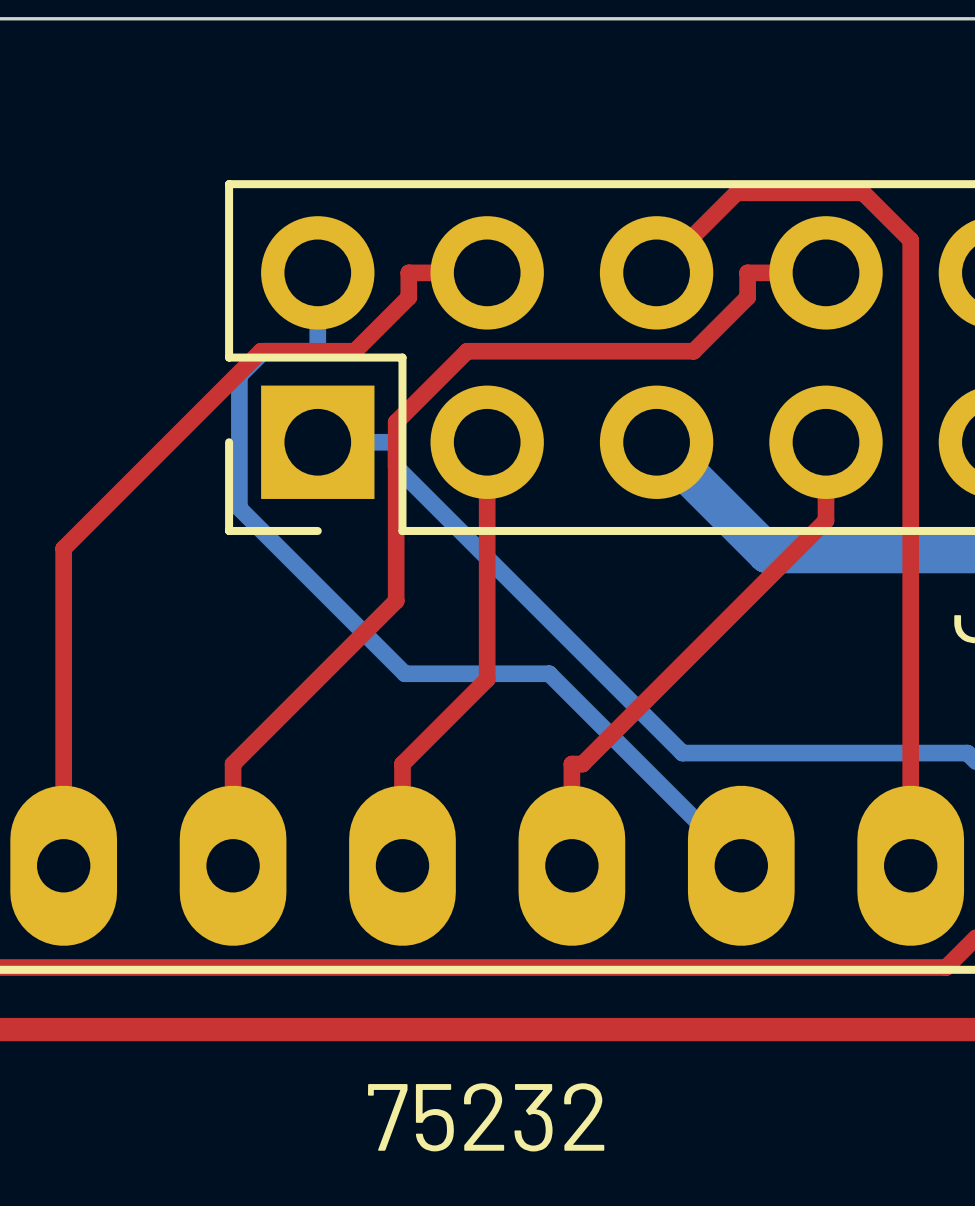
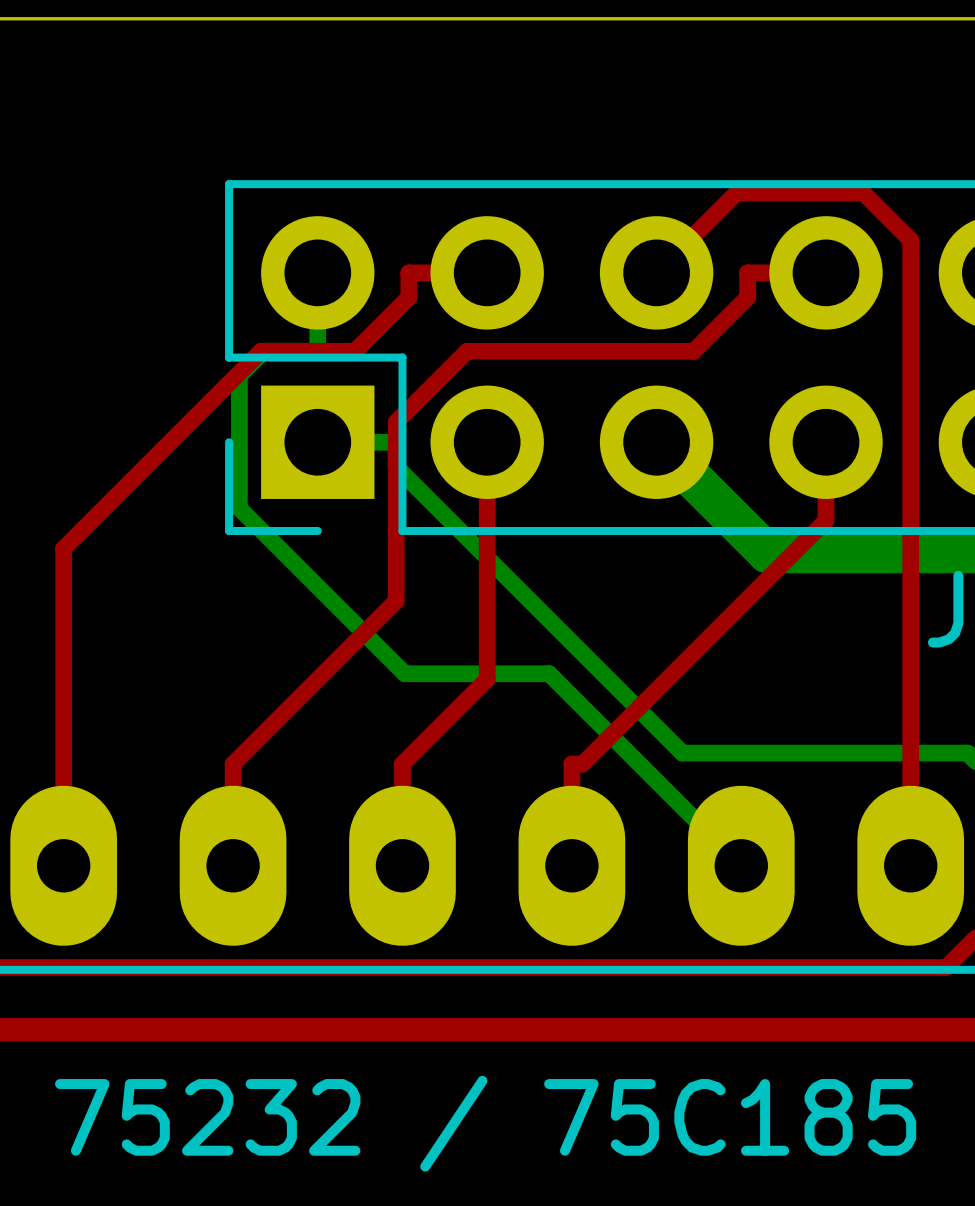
text: 75232 (486, 1117) -> 75232 / 75C185 (485, 1123)

